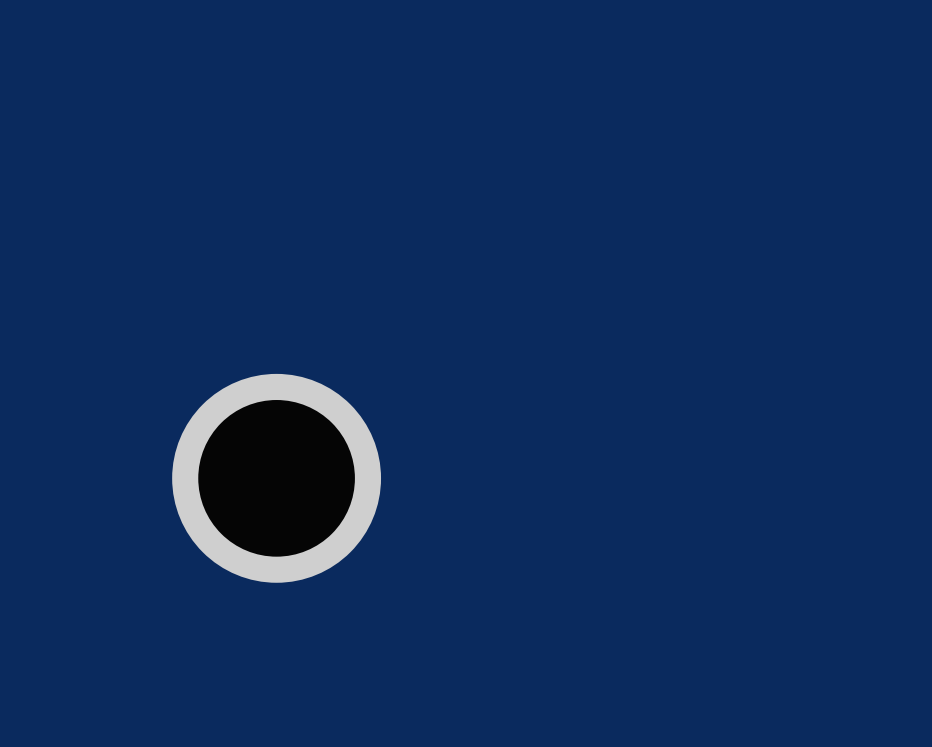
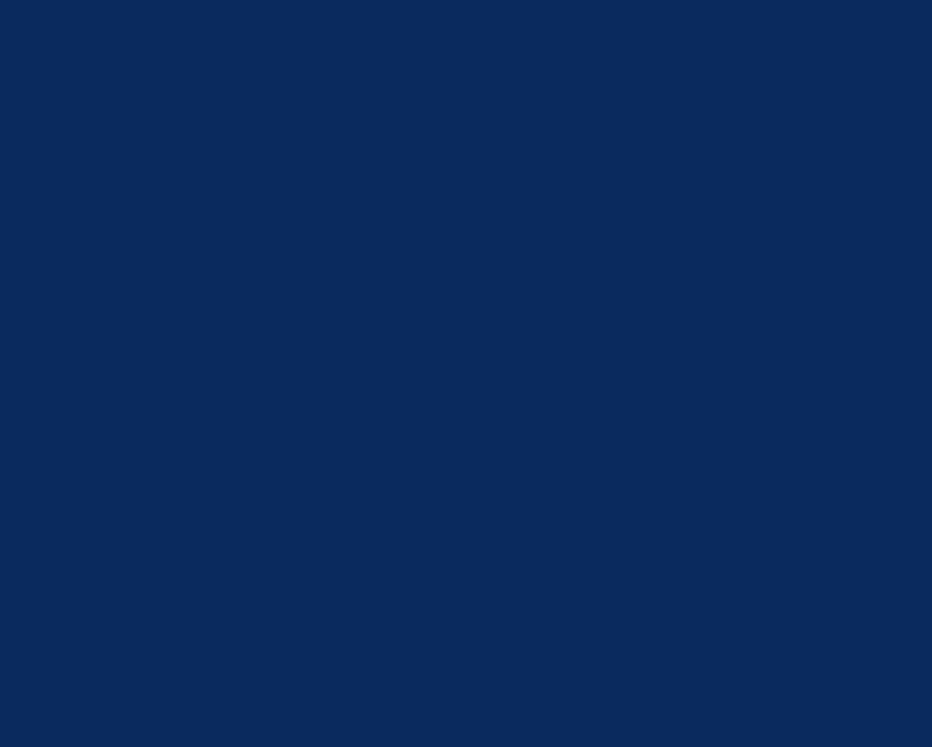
part: (276, 478) -> none

